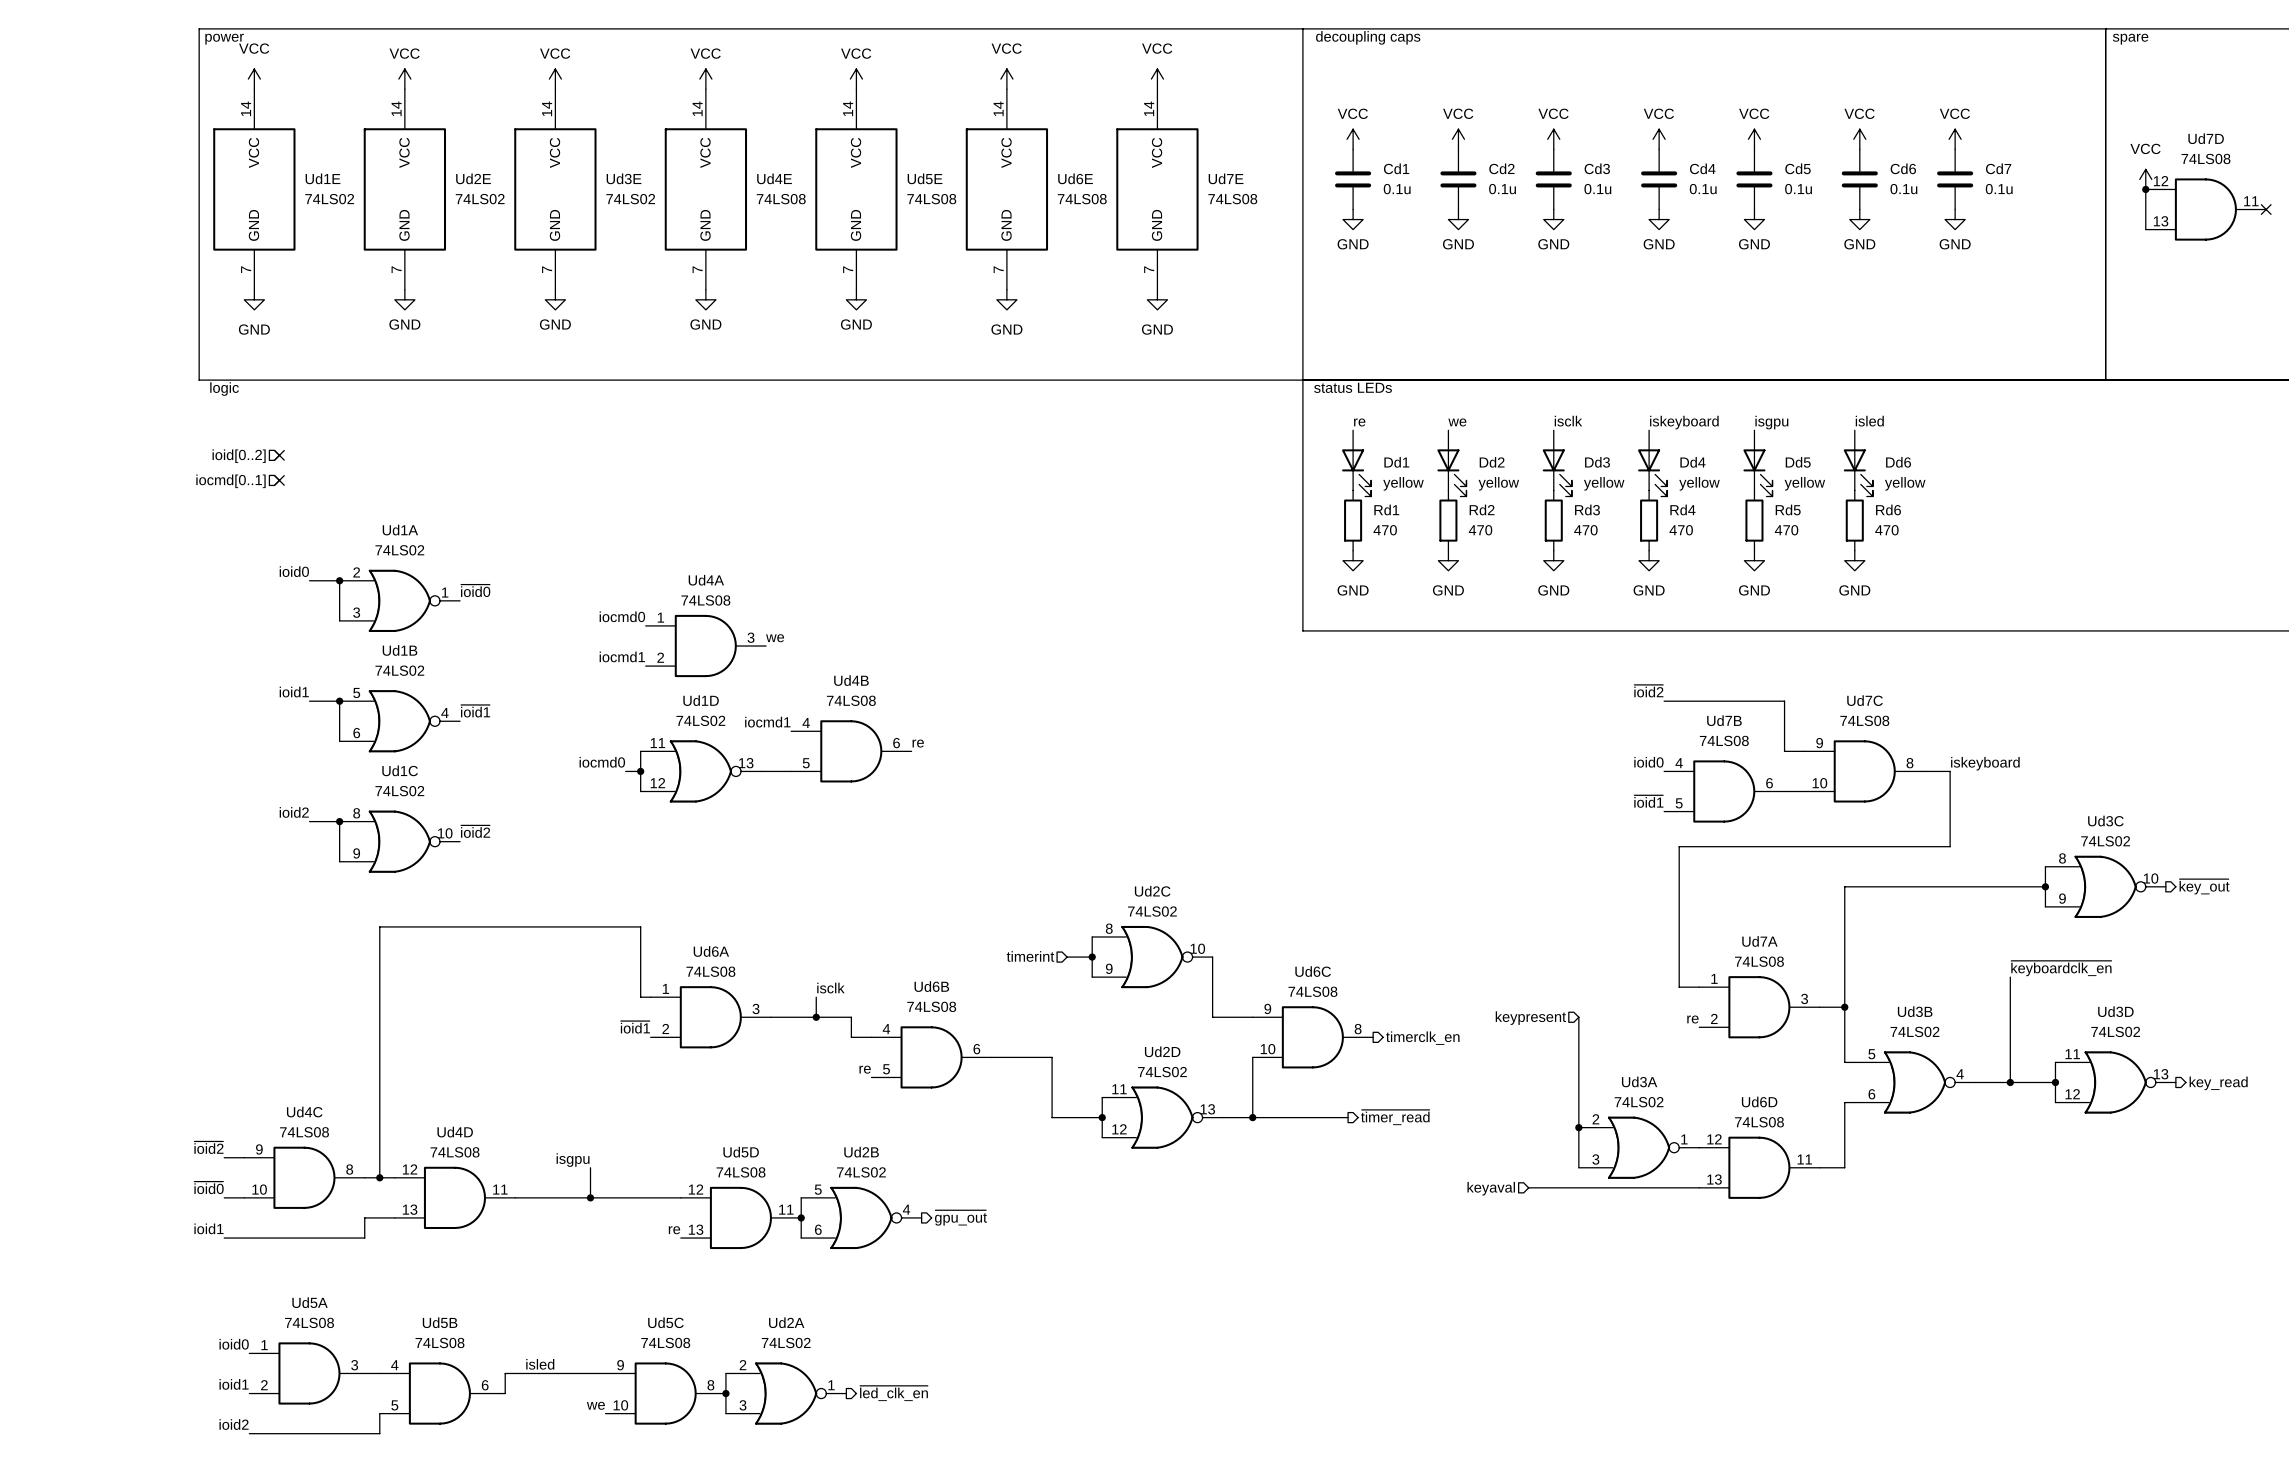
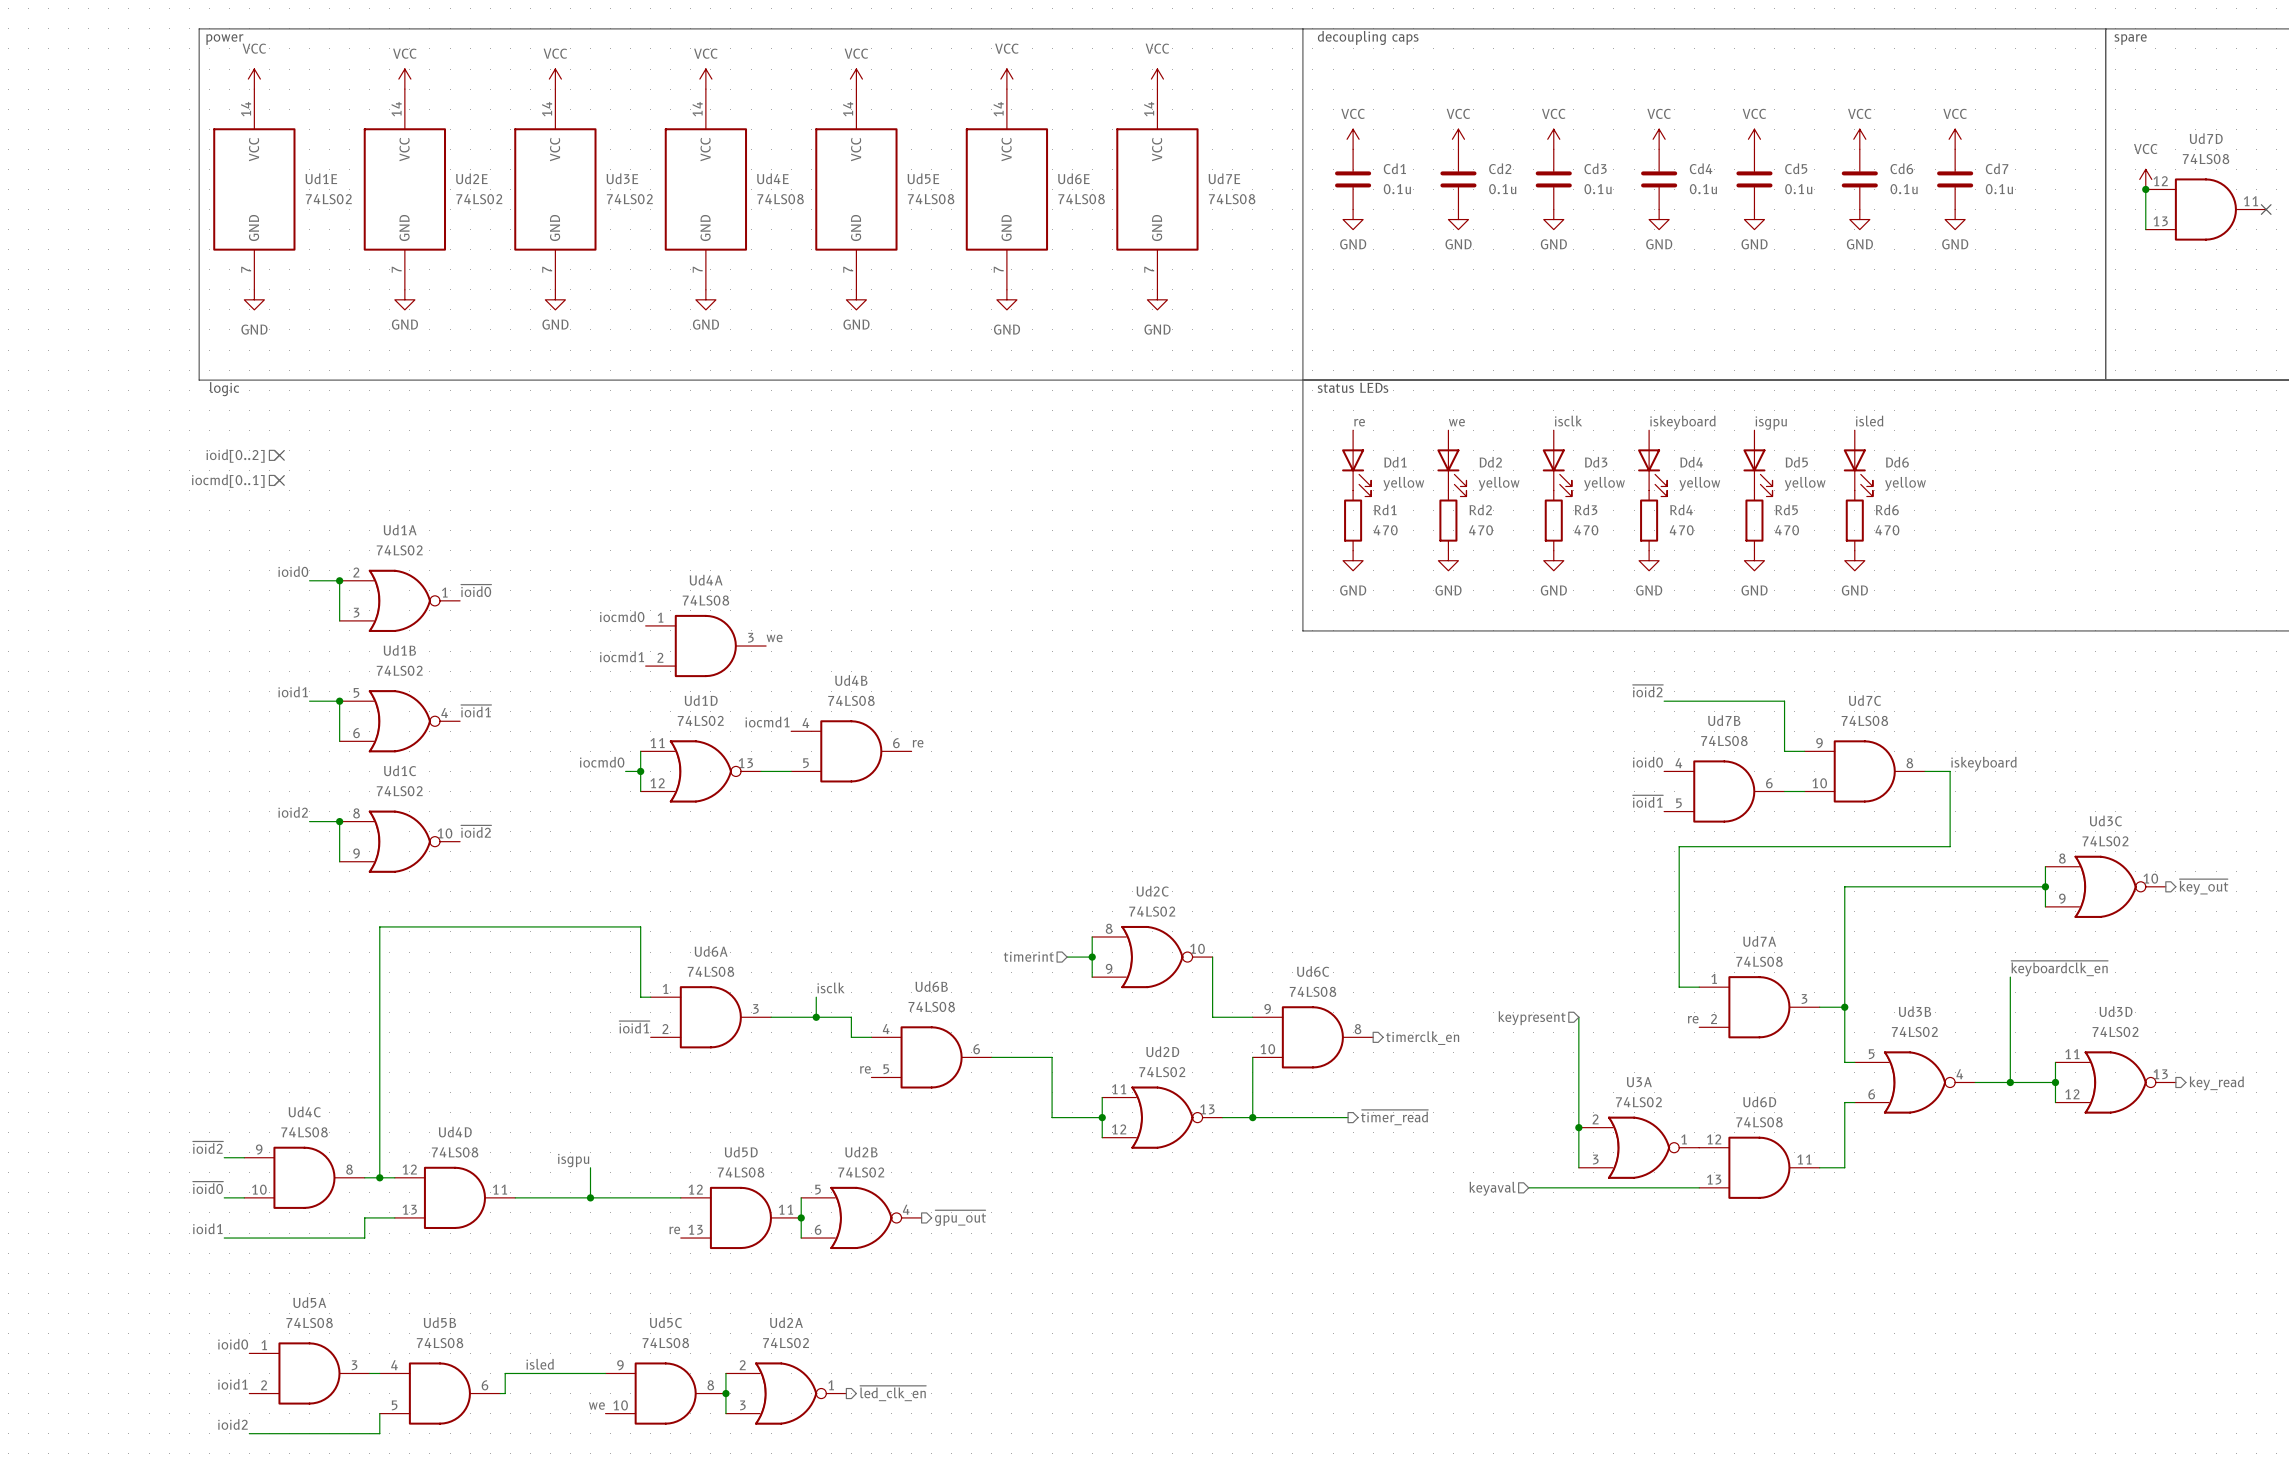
Ud3A name: Ud3A (1639, 1081) -> U3A (1639, 1082)

